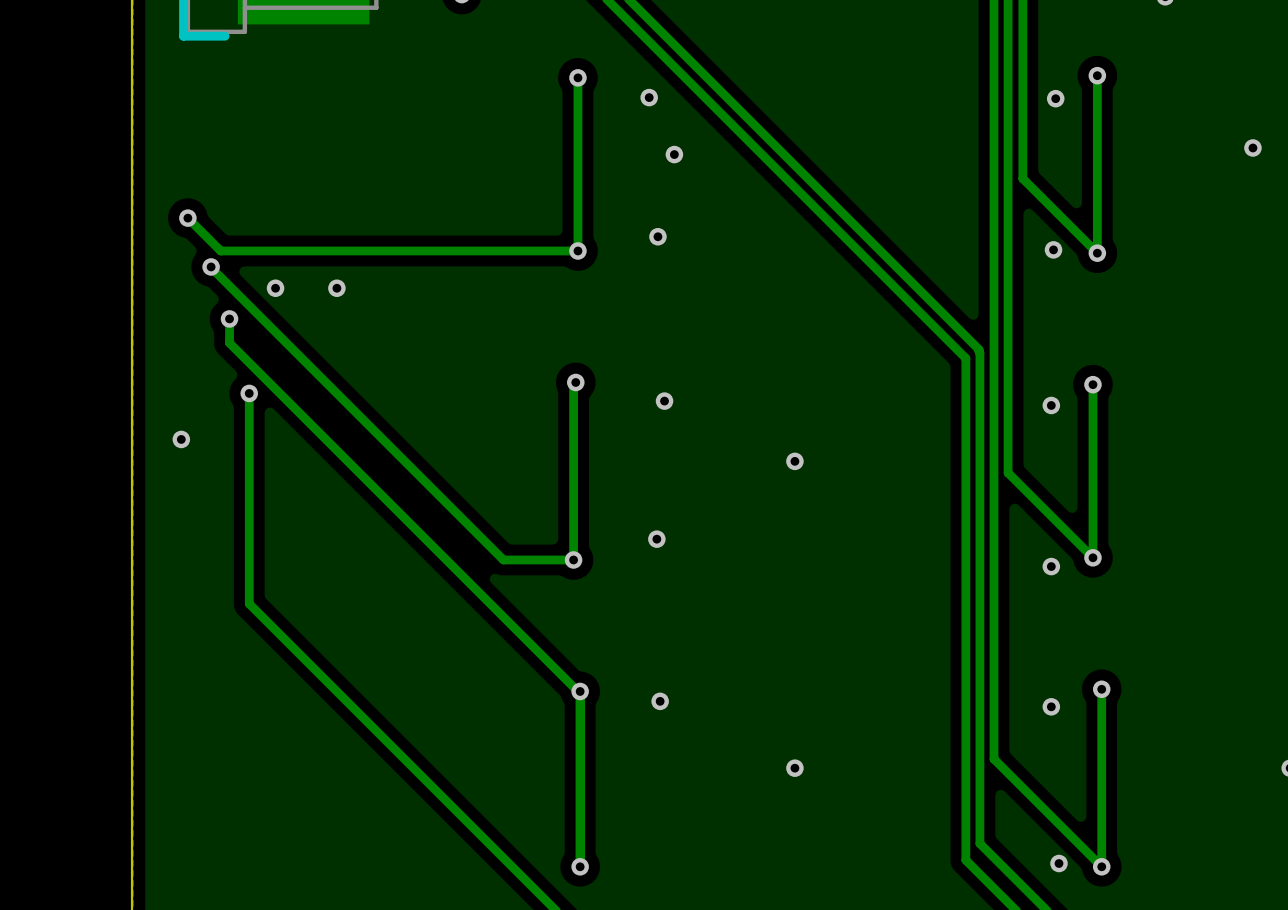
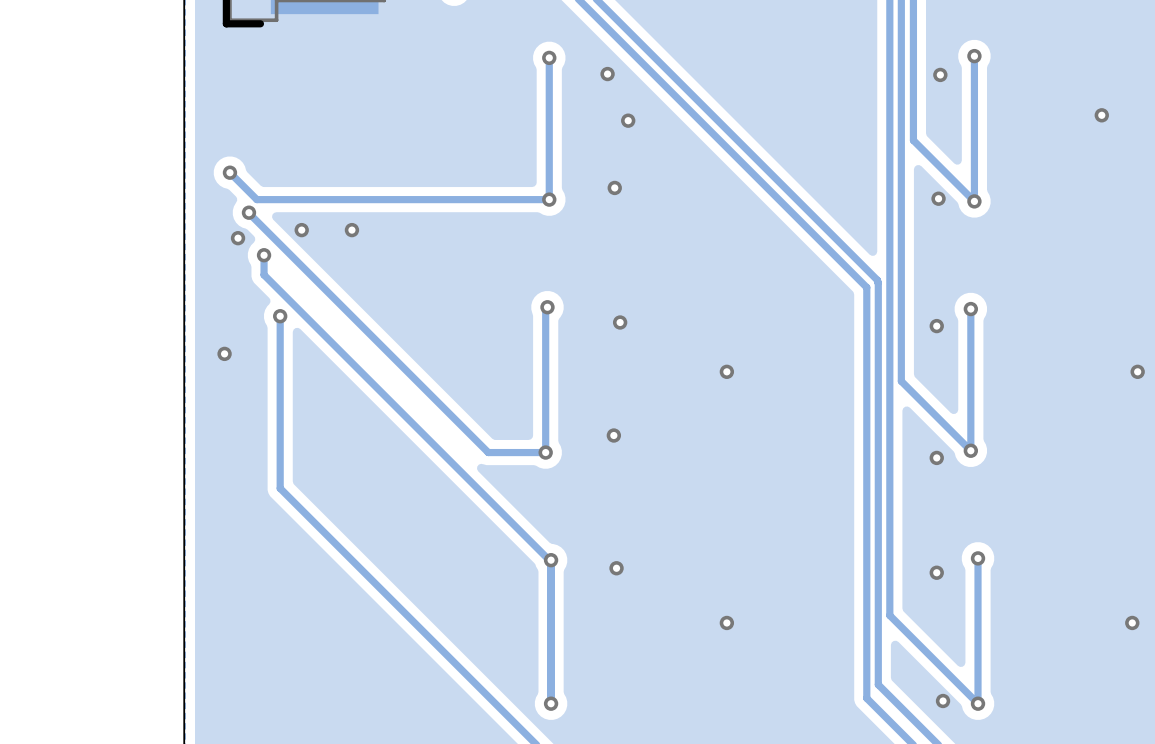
via: none -> (238, 238)

